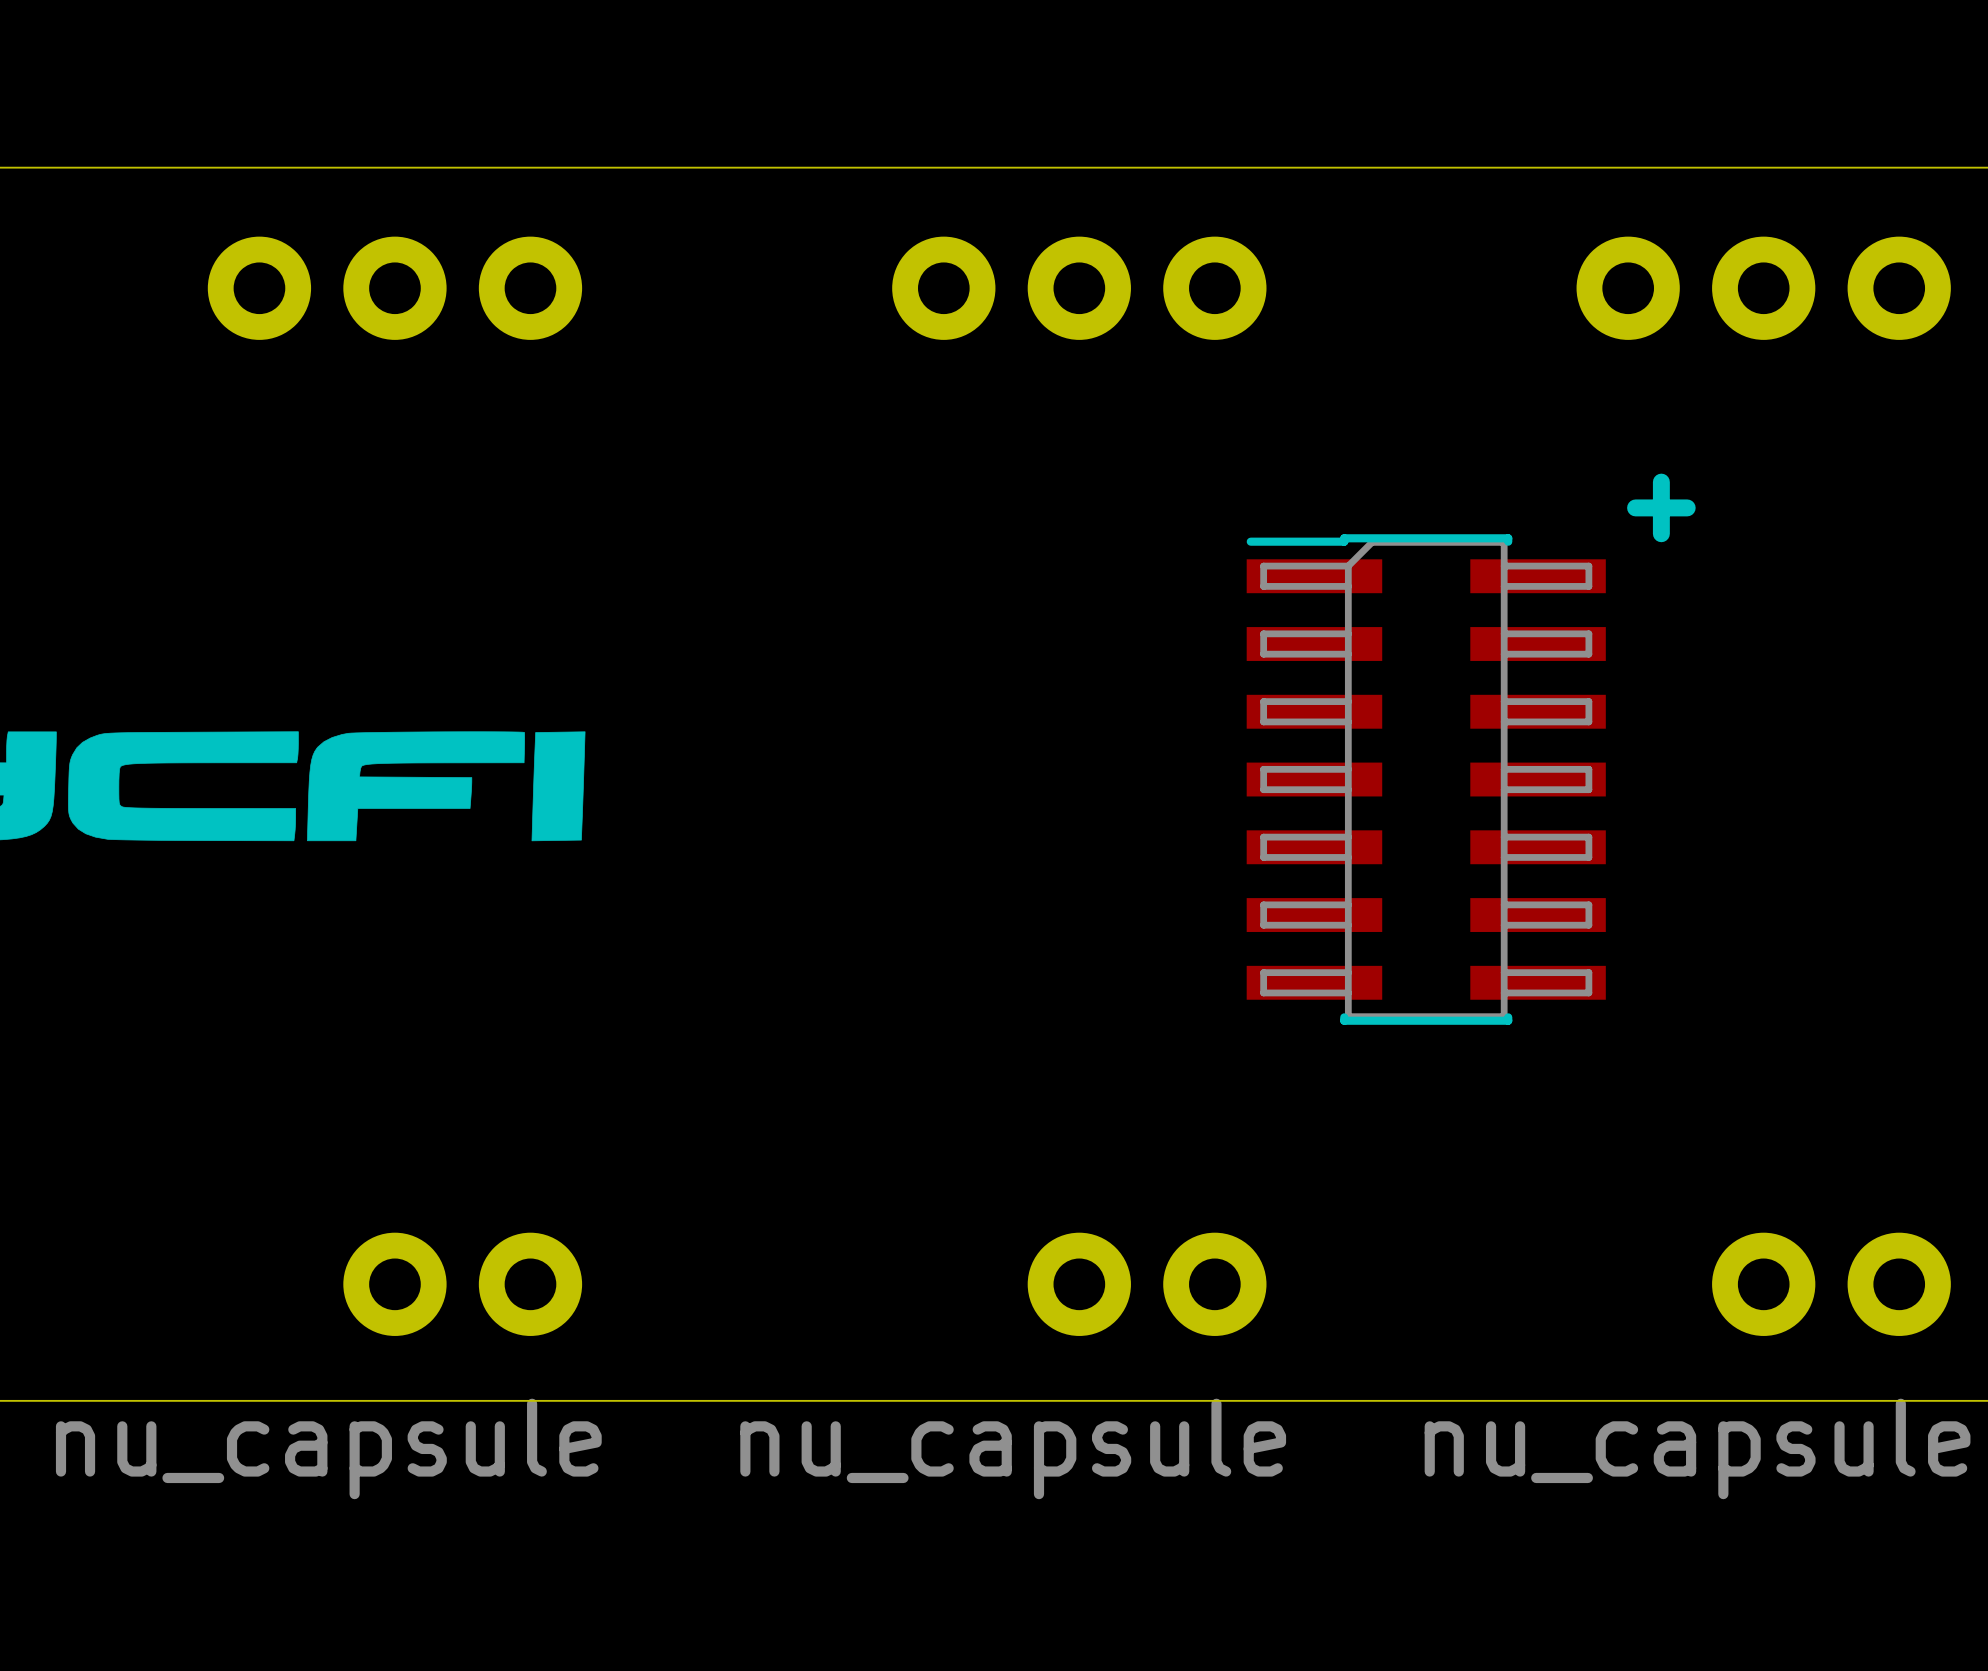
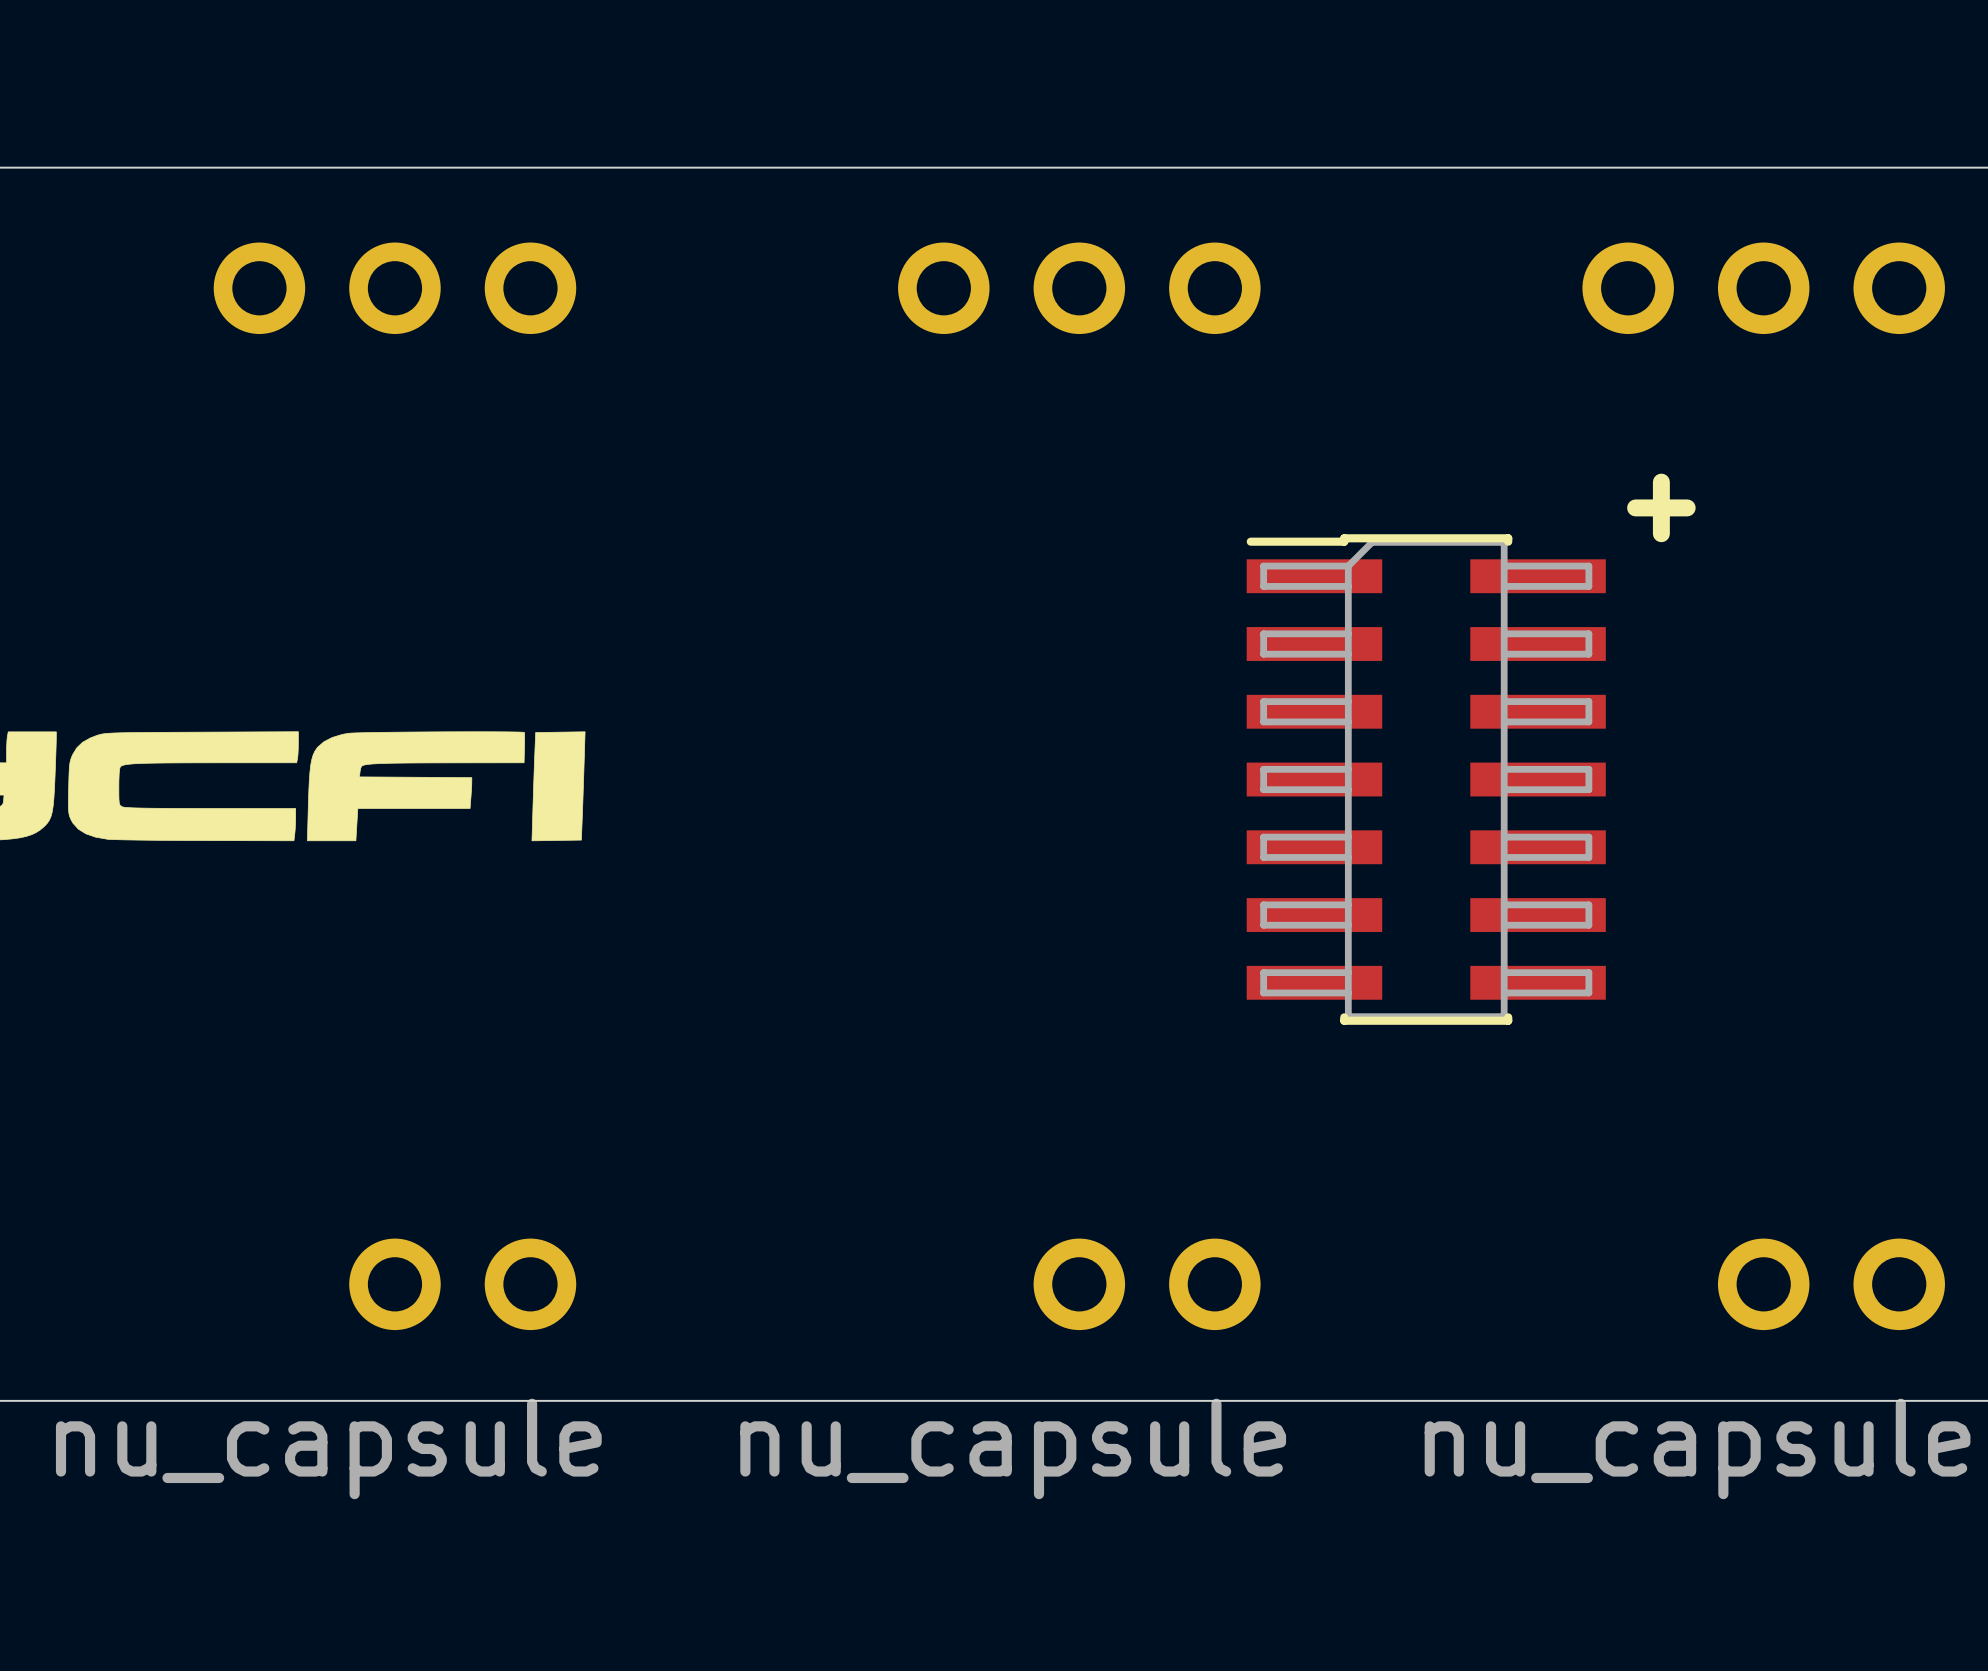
part footprint: [207, 236, 583, 1336] -> [213, 242, 577, 1331]
part footprint: [892, 236, 1267, 1336] -> [898, 242, 1261, 1331]
part footprint: [1576, 236, 1951, 1336] -> [1582, 242, 1945, 1331]

